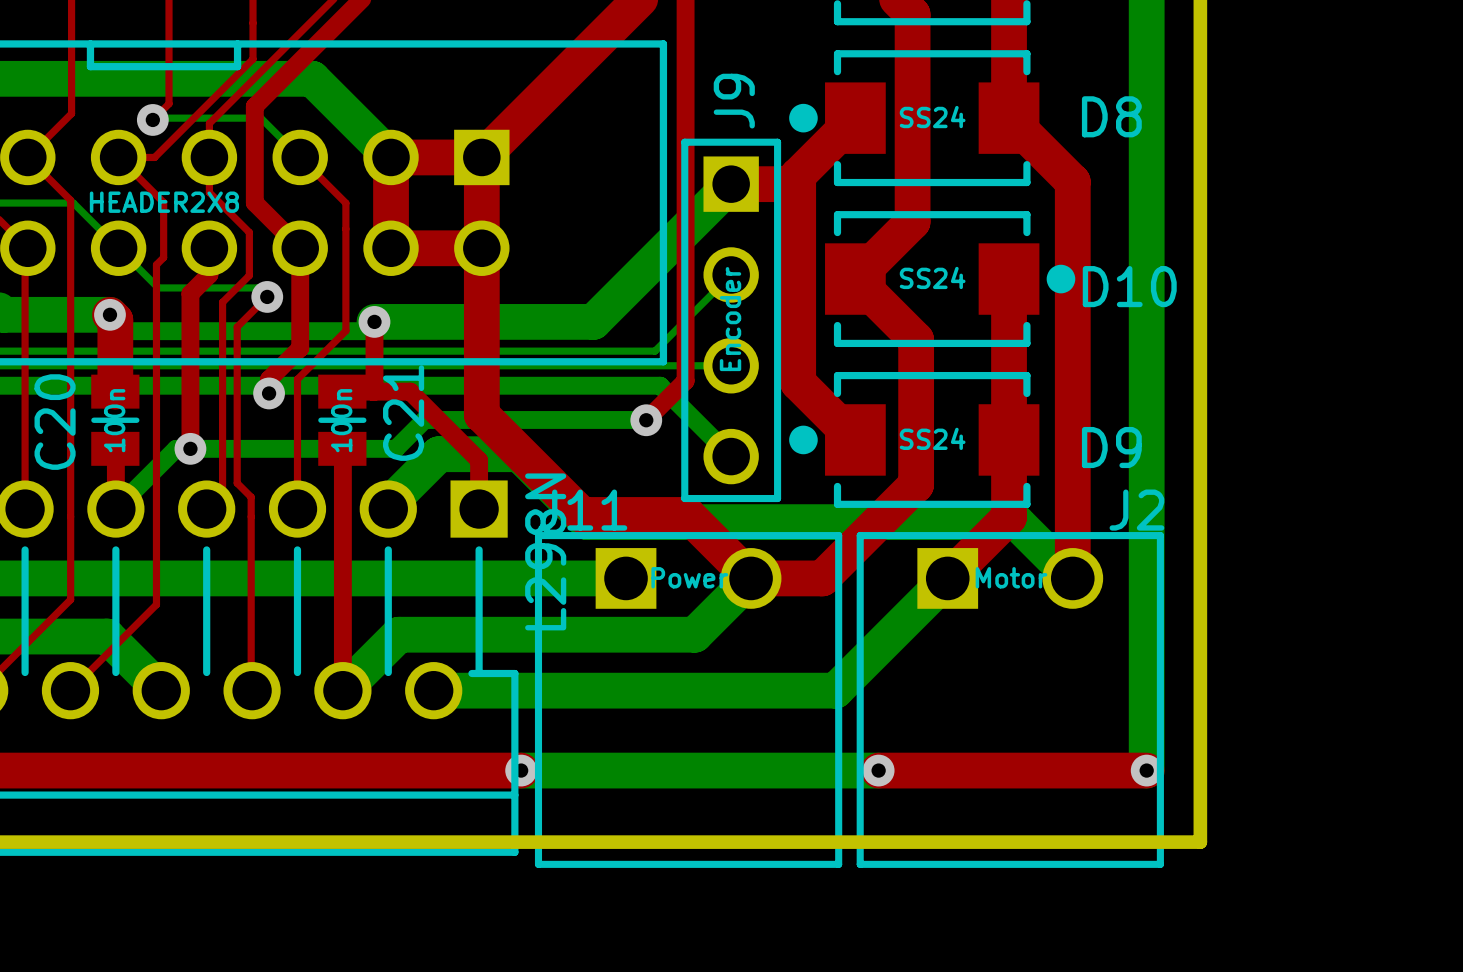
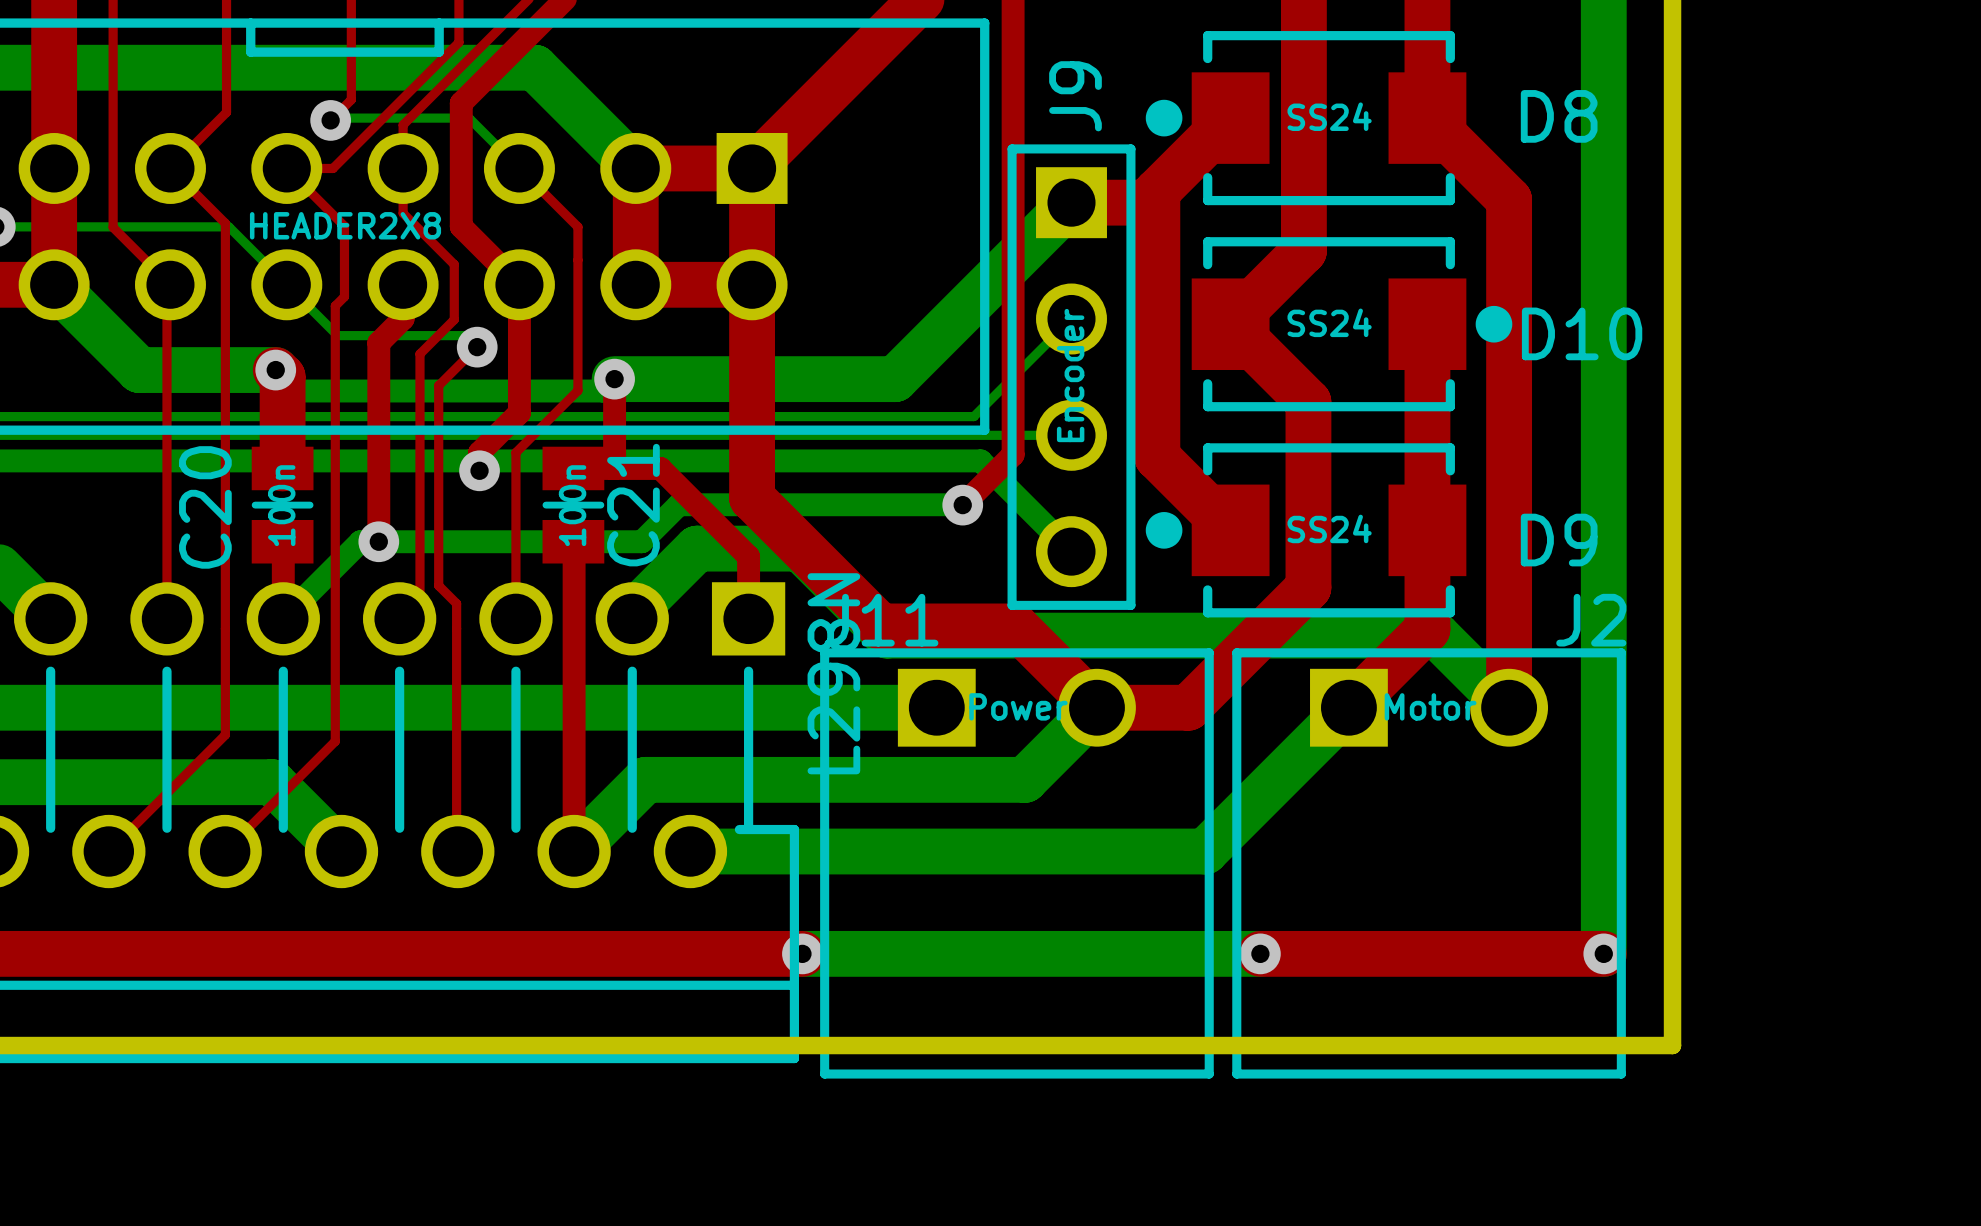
C21 name position: C21 (403, 413) -> C21 (633, 505)

